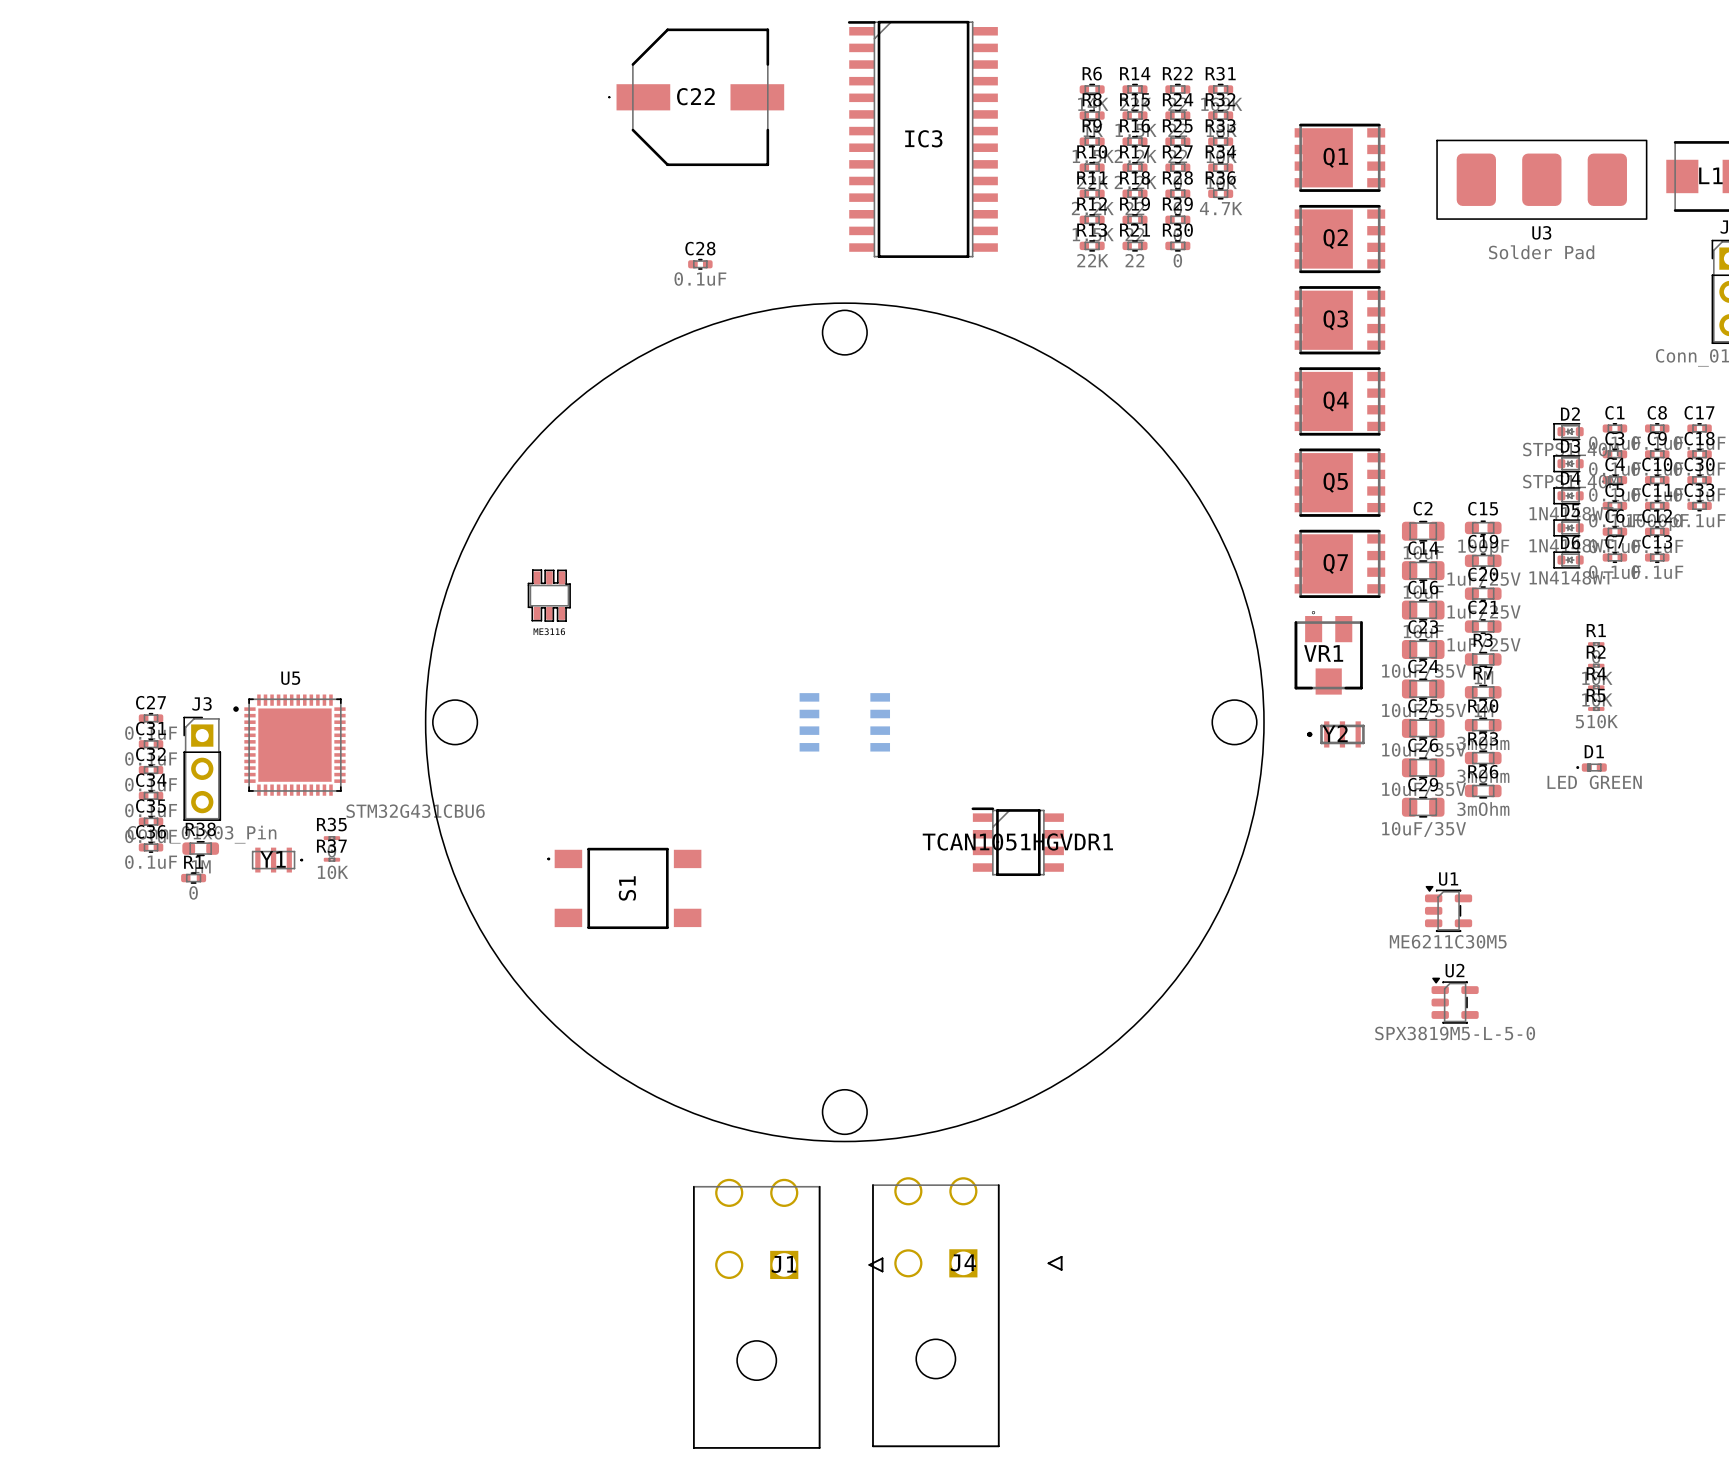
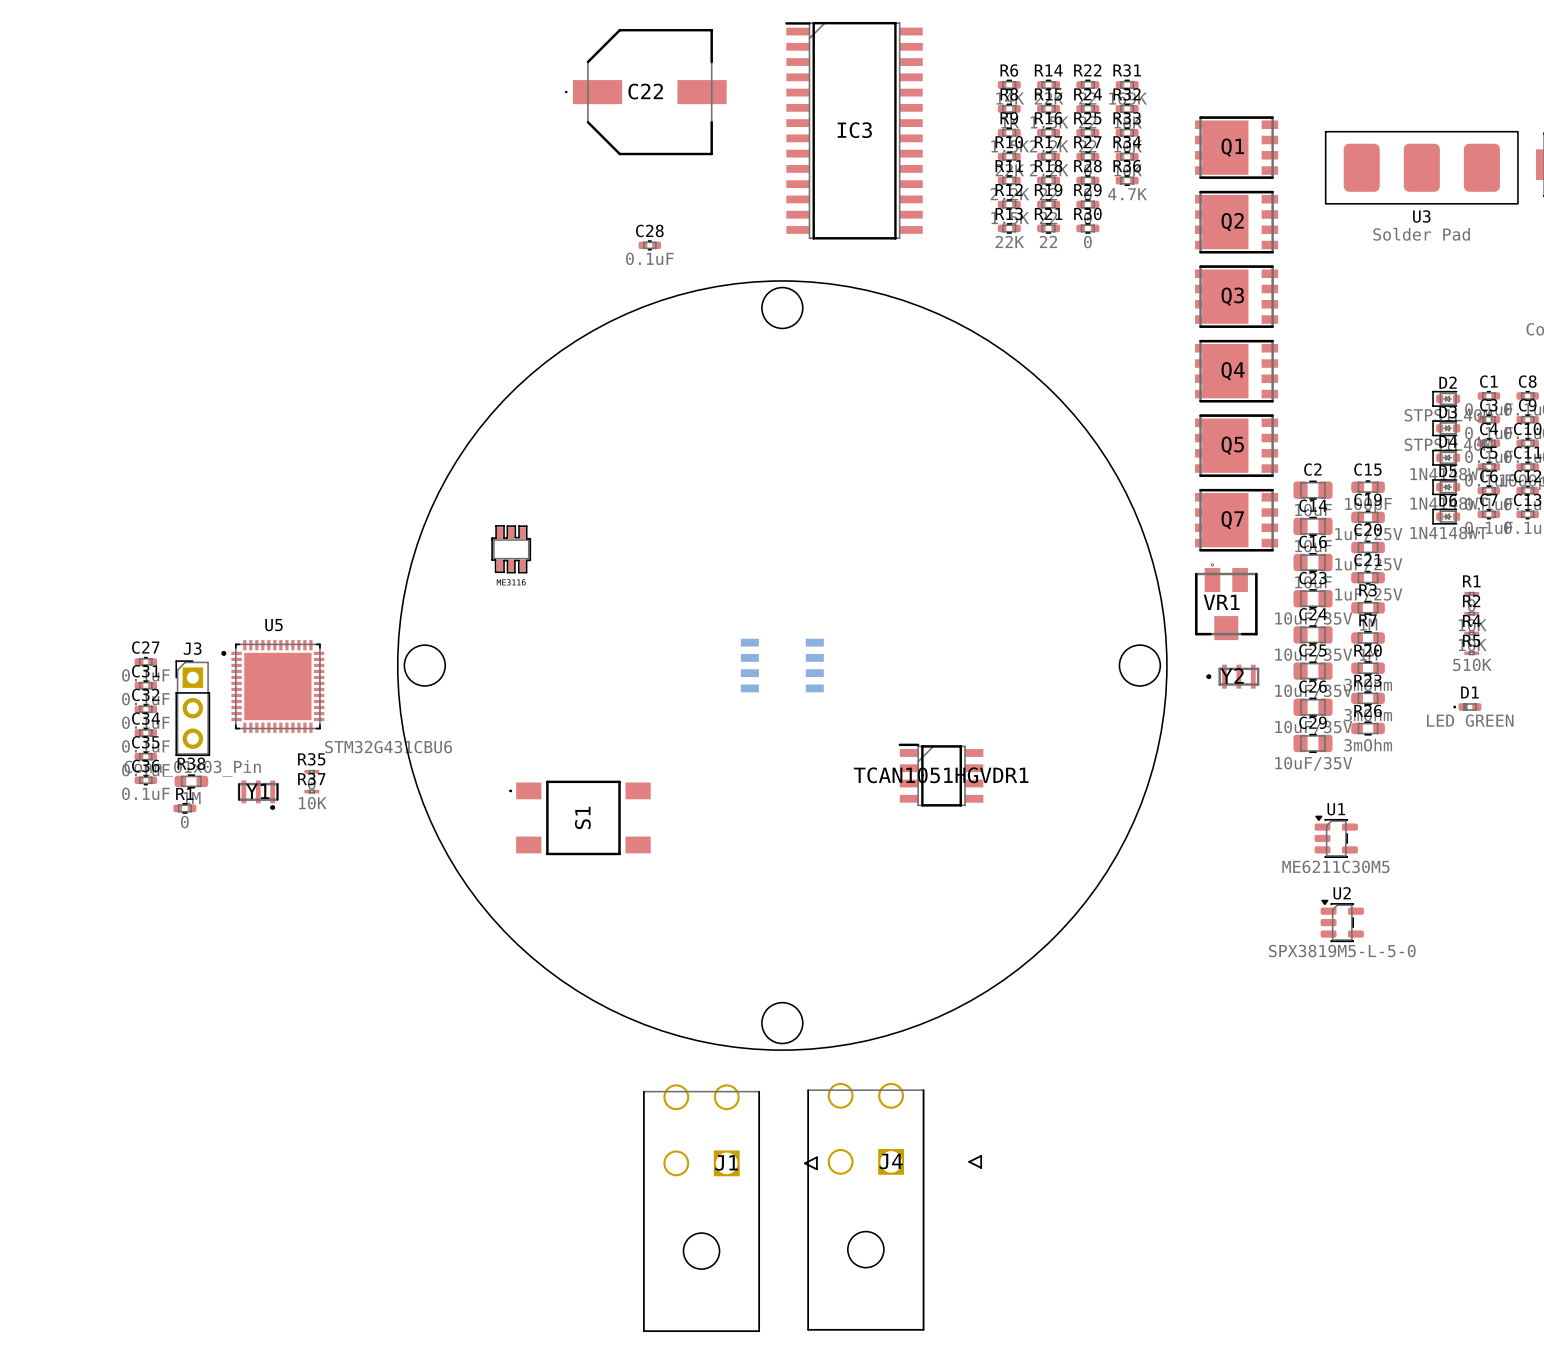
Y1 footprint: [251, 847, 304, 873] -> [237, 780, 279, 810]

